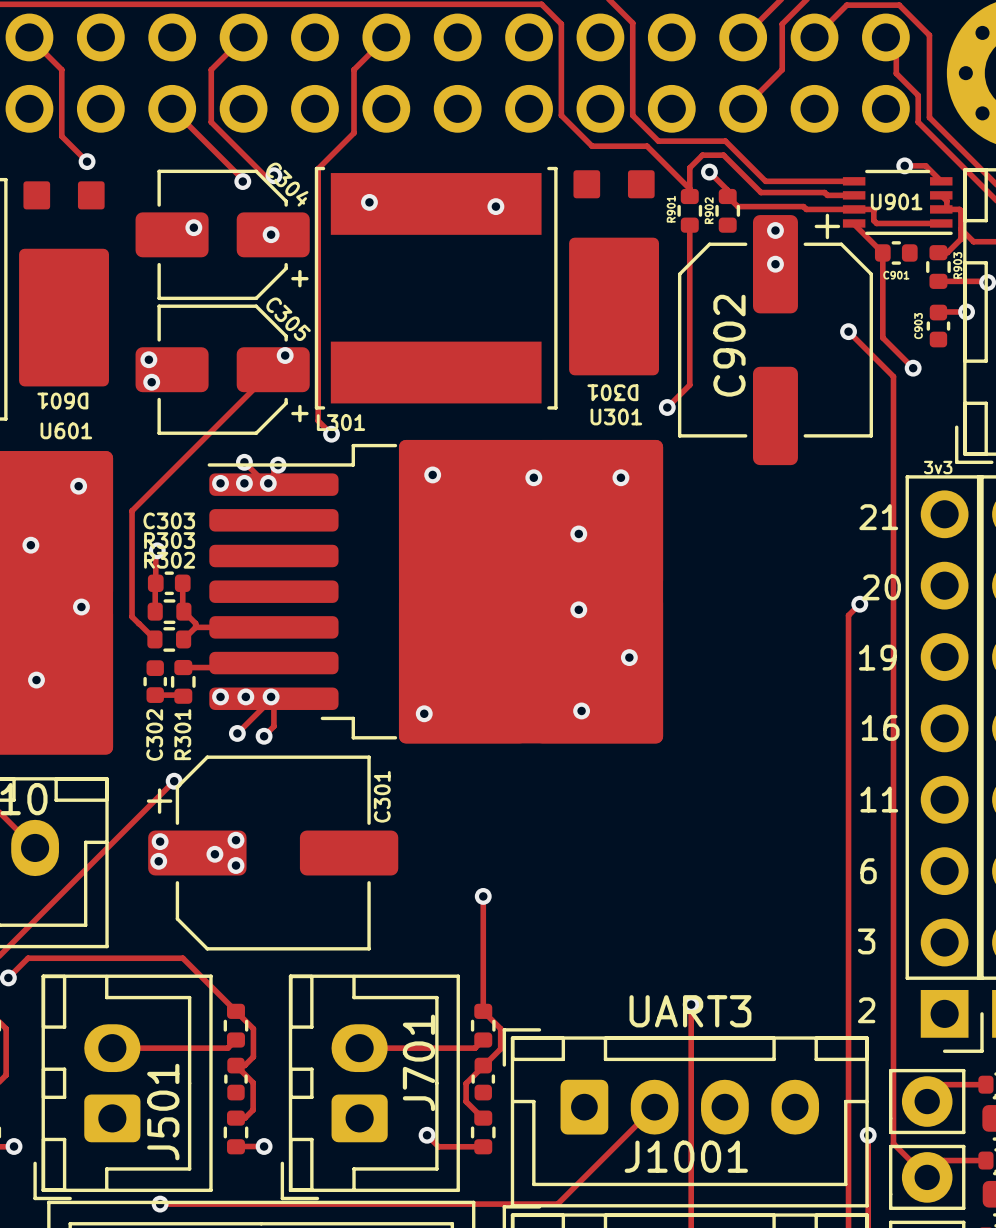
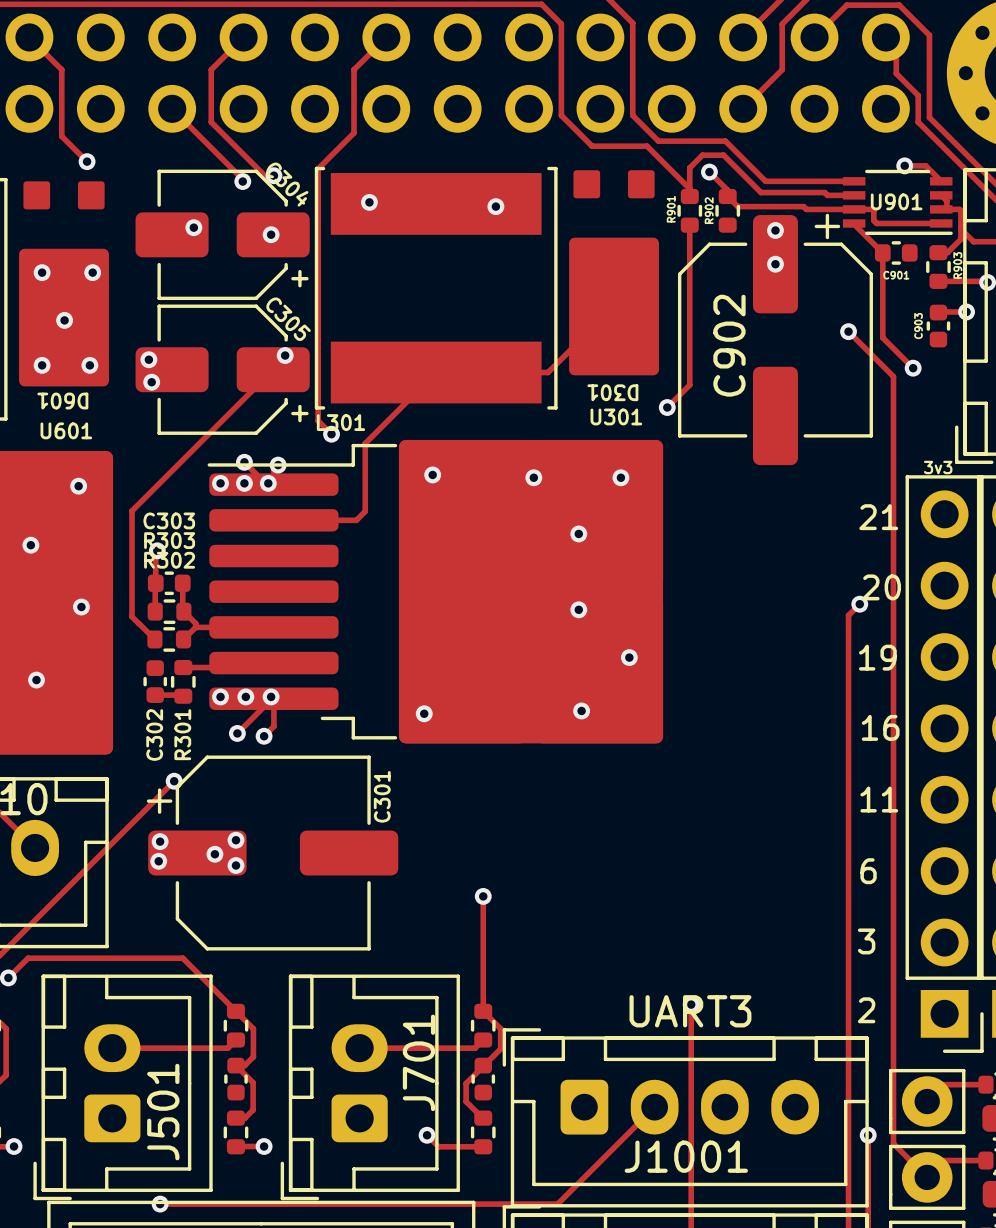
via: none -> (42, 272)
via: none -> (92, 272)
track: none -> (614, 306) (548, 372) (436, 372) (365, 443) (365, 511) (356, 520) (273, 520)
via: none -> (64, 320)
via: none -> (42, 365)
via: none -> (89, 365)

